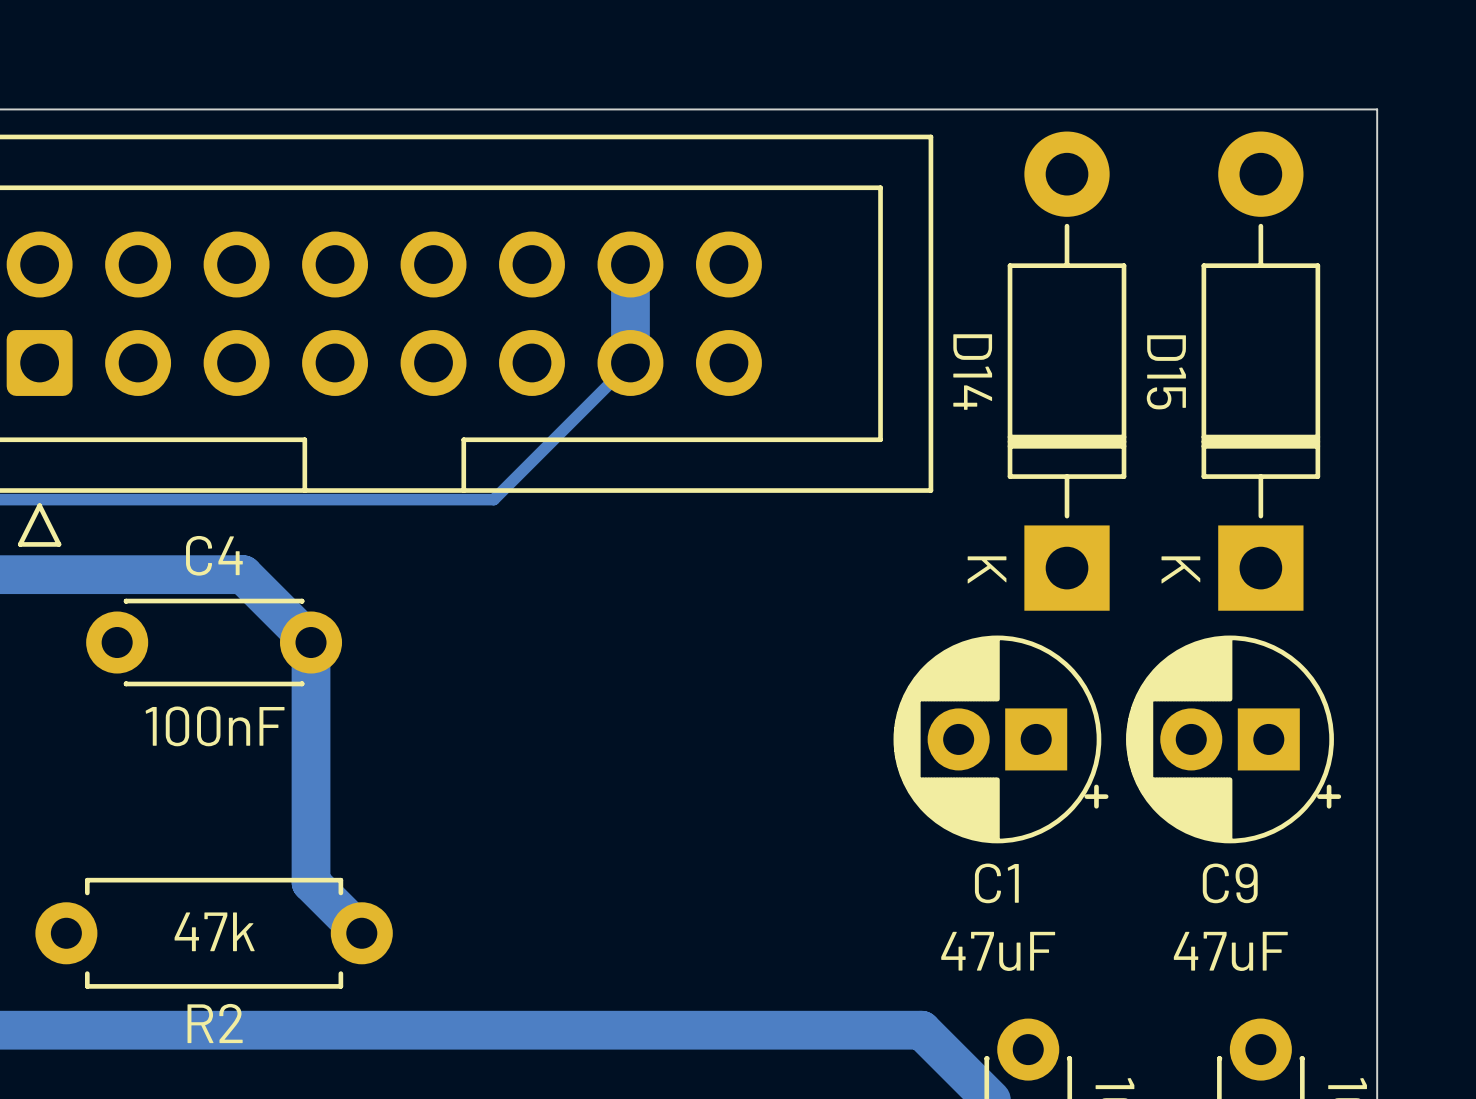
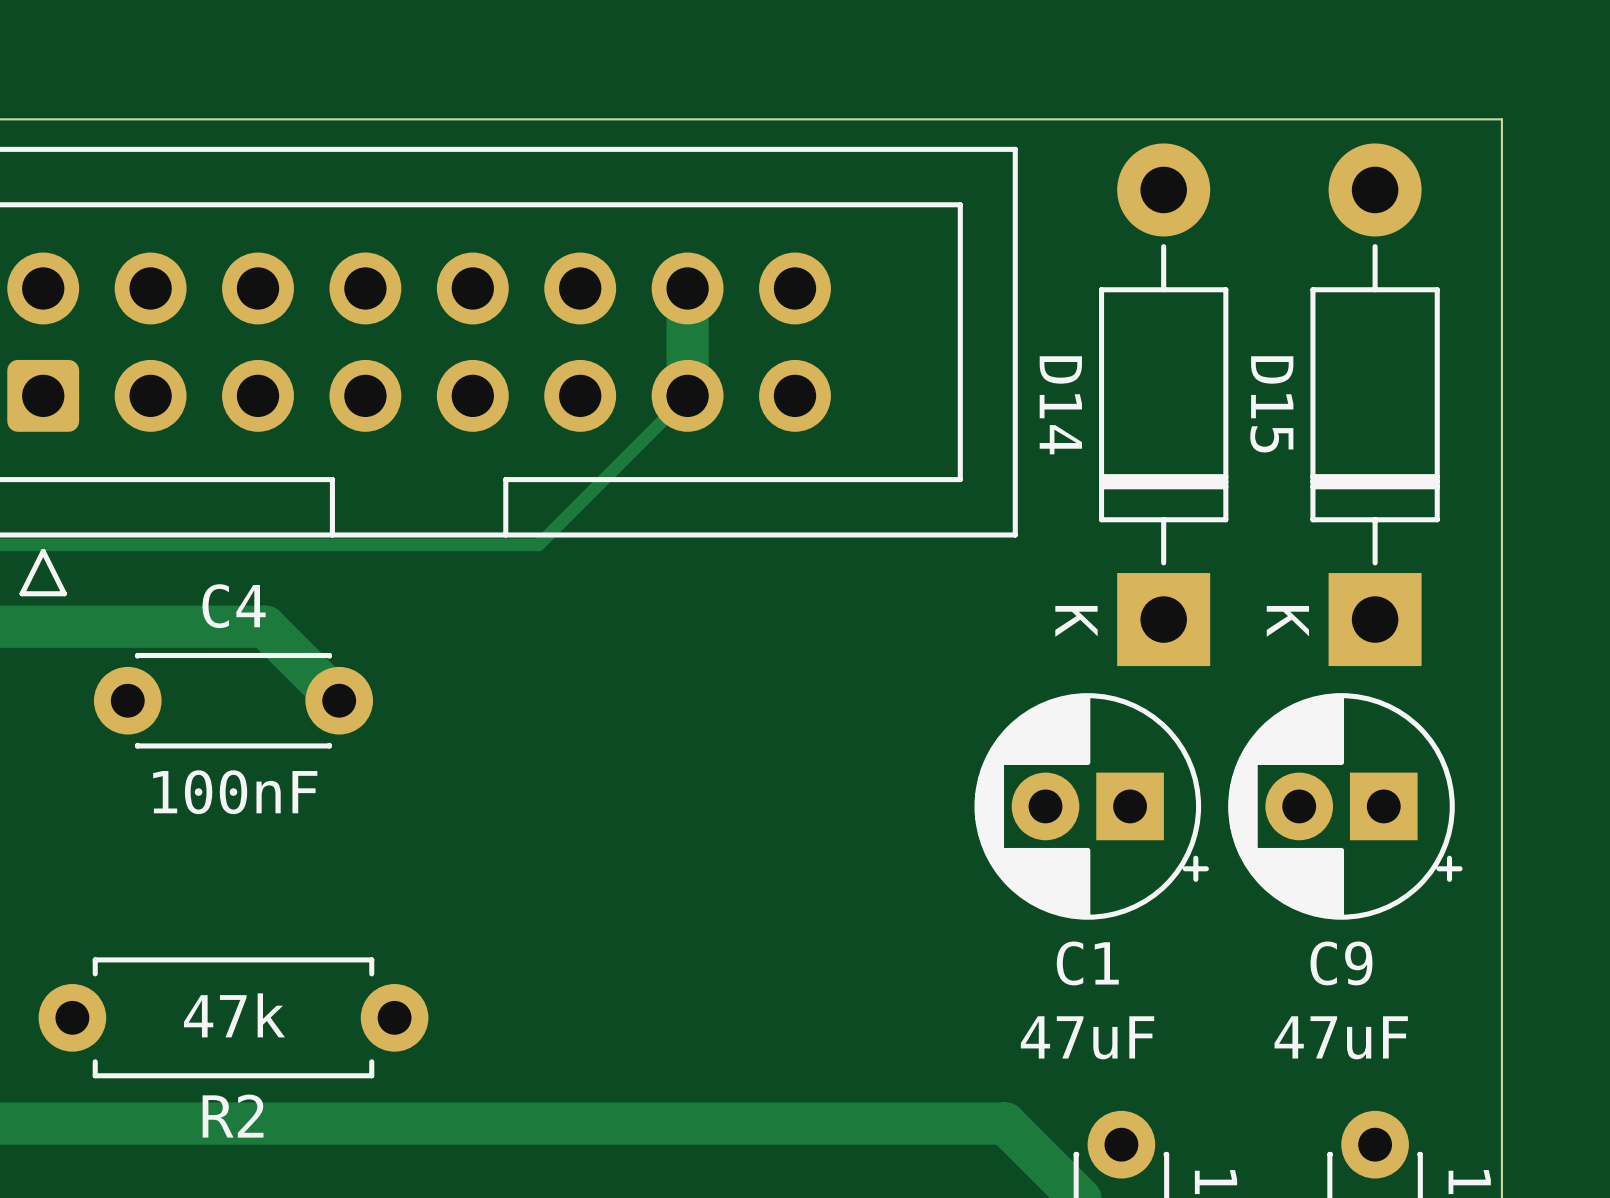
track: (311, 642) (311, 882) (361, 933) -> none

